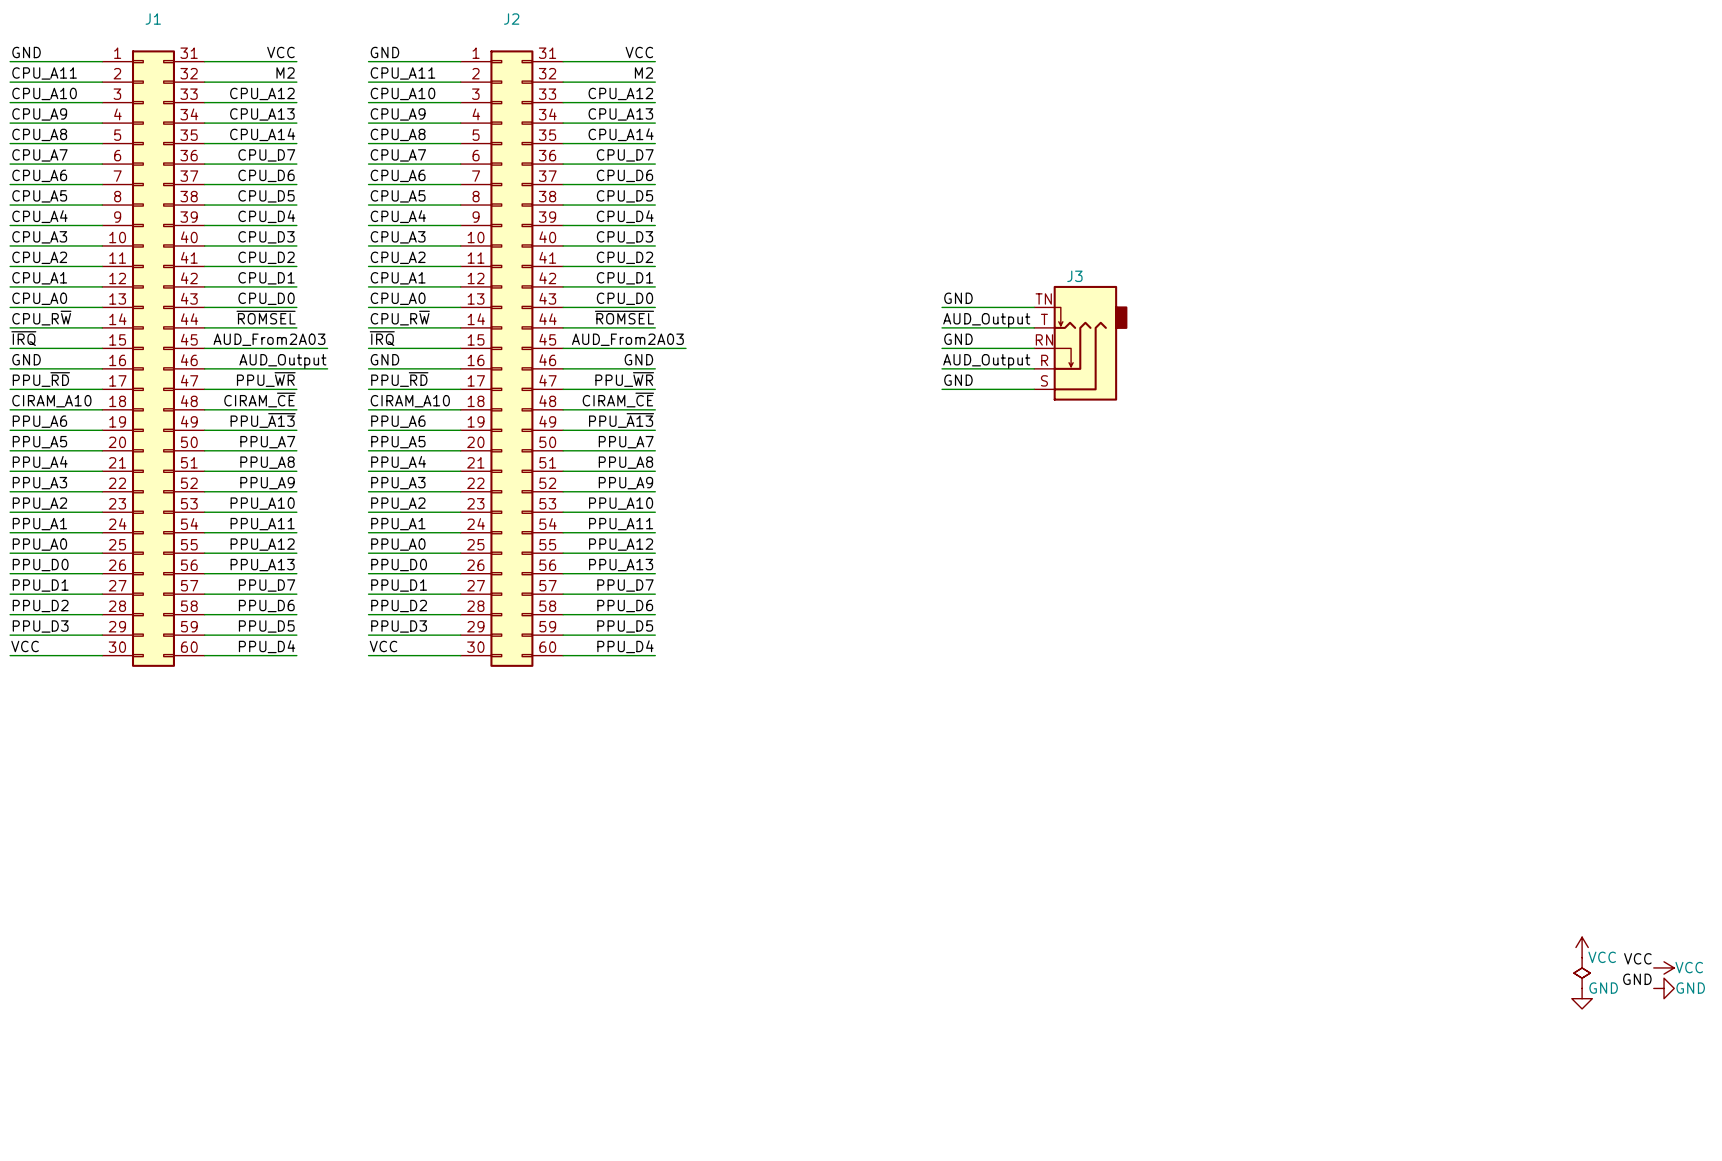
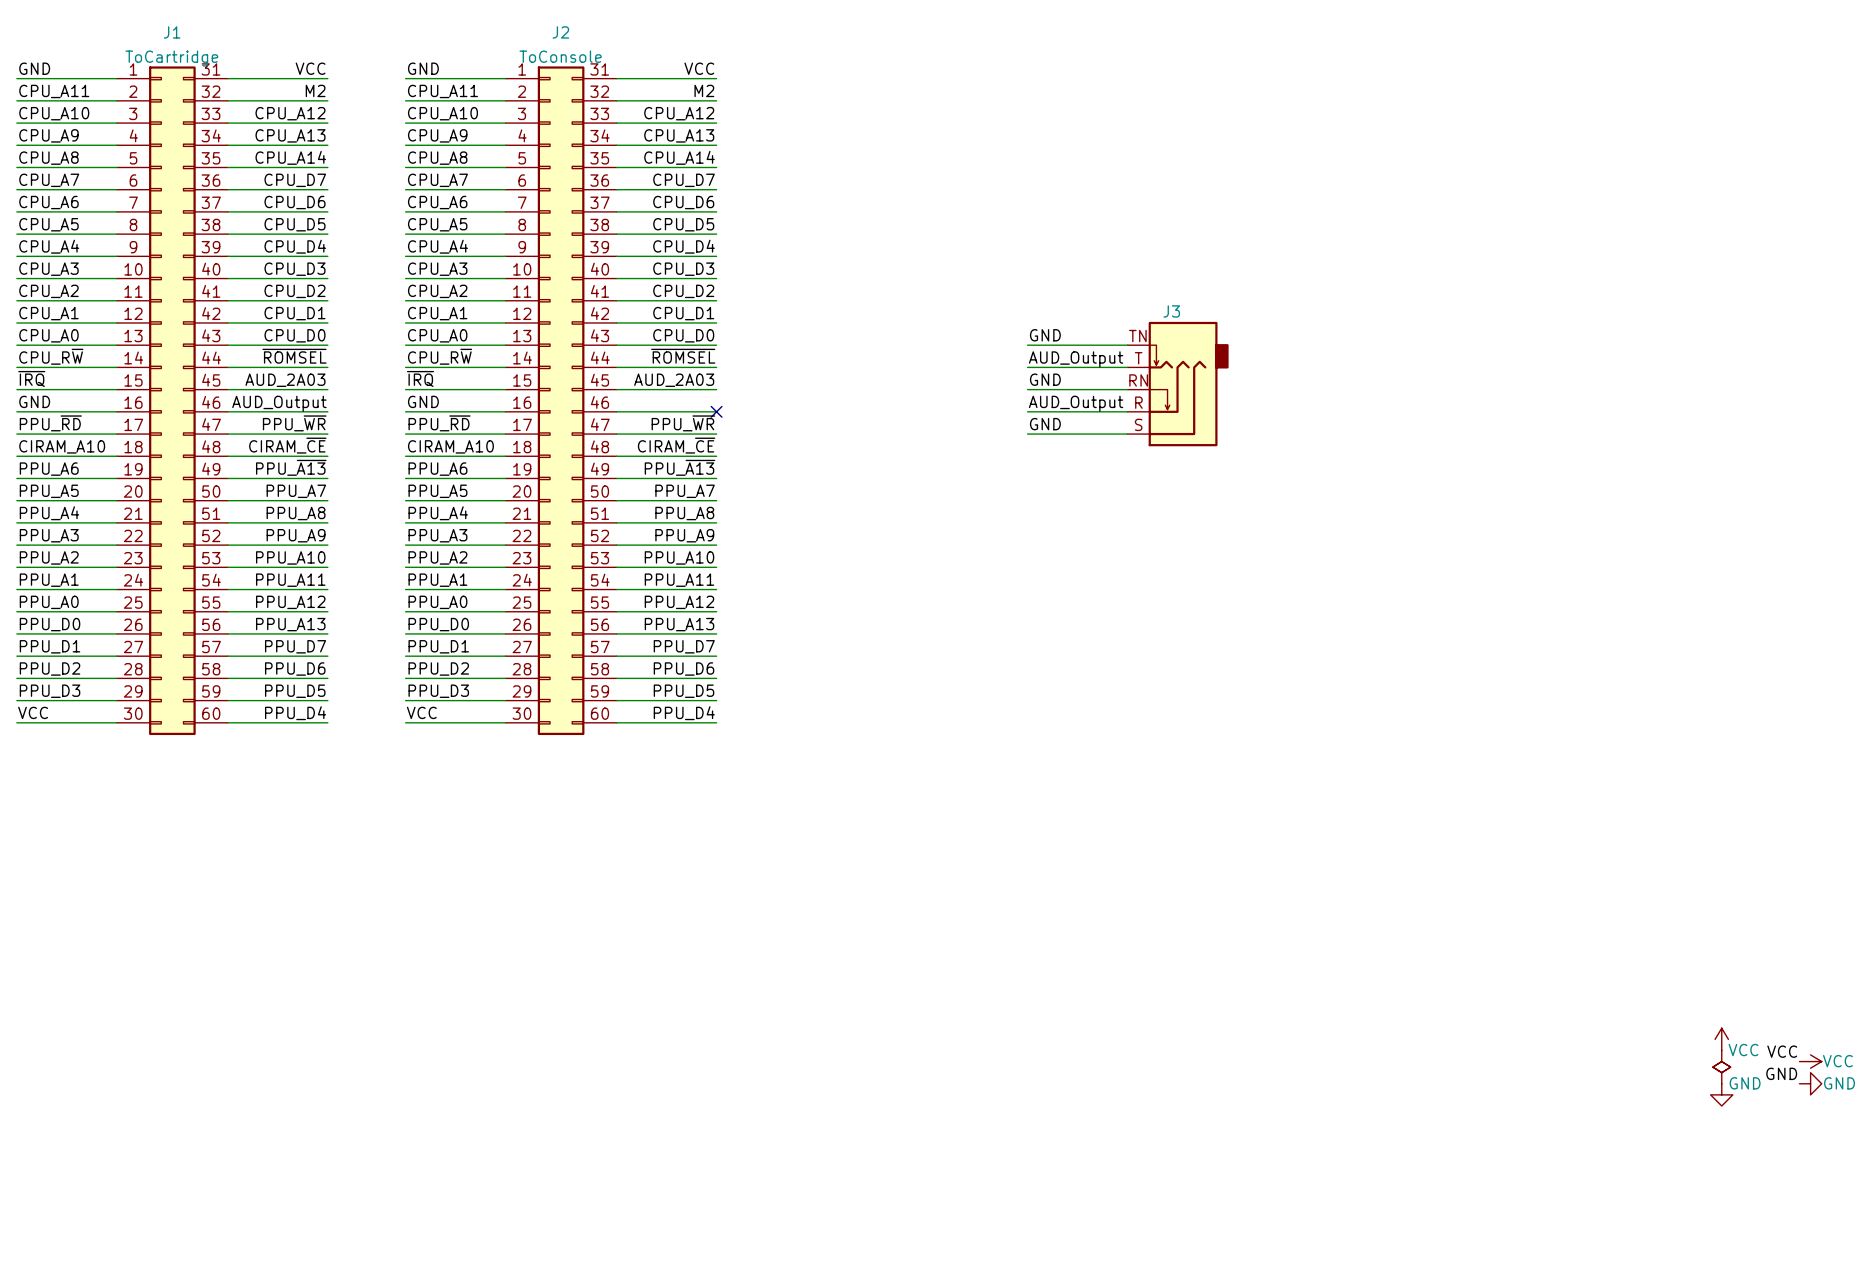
J2 value: none -> ToConsole (560, 56)
J1 value: none -> ToCartridge (171, 58)
label: AUD_From2A03 (269, 339) -> AUD_2A03 (285, 380)
label: AUD_From2A03 (627, 339) -> AUD_2A03 (674, 380)
wire: (296, 348) (327, 348) -> none
wire: (655, 348) (686, 348) -> none
label: GND (638, 359) -> none
label position: AUD_Output (282, 361) -> AUD_Output (279, 403)
wire: (296, 368) (327, 368) -> none
no-connect mark: none -> (716, 411)

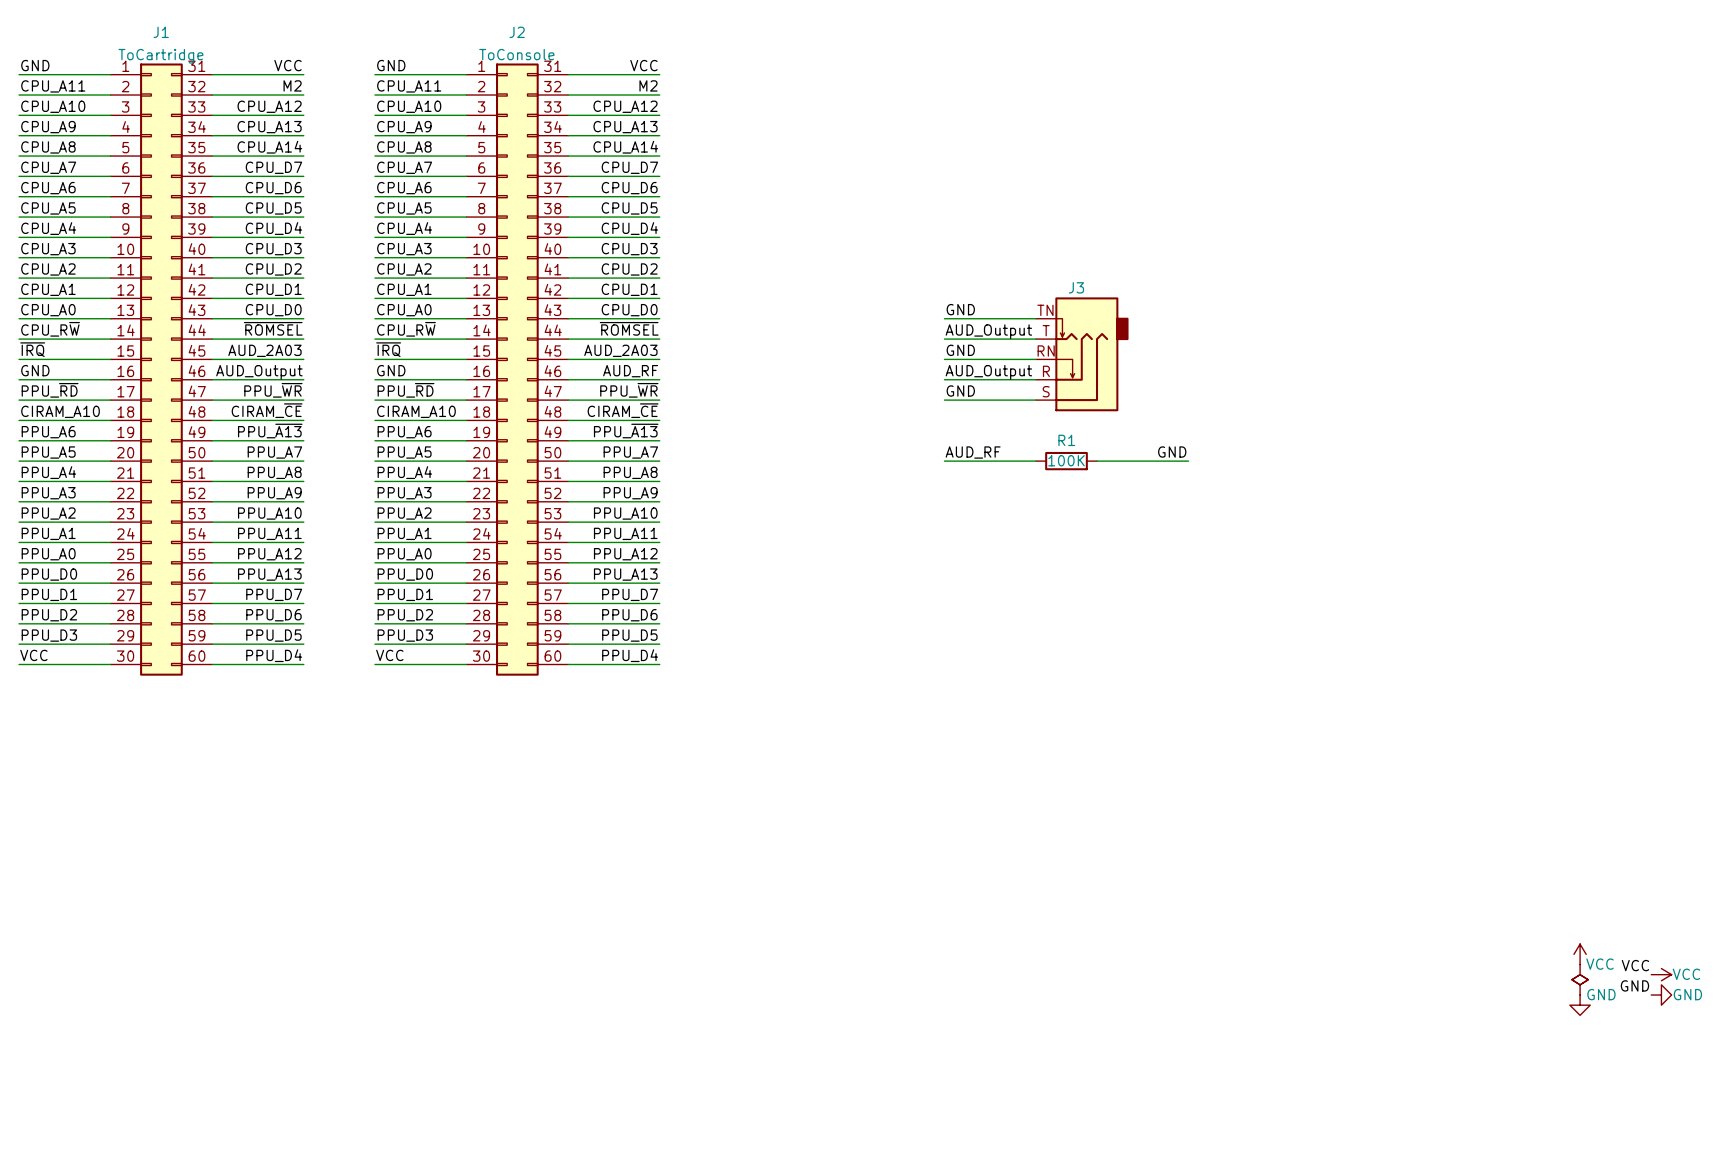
label: none -> AUD_RF (630, 371)
no-connect mark: (716, 411) -> none
label: none -> GND (1172, 452)
label: none -> AUD_RF (973, 452)
wire: none -> (944, 461) (1036, 461)
R1: none -> 100K (1066, 461)
wire: none -> (1097, 461) (1188, 461)

